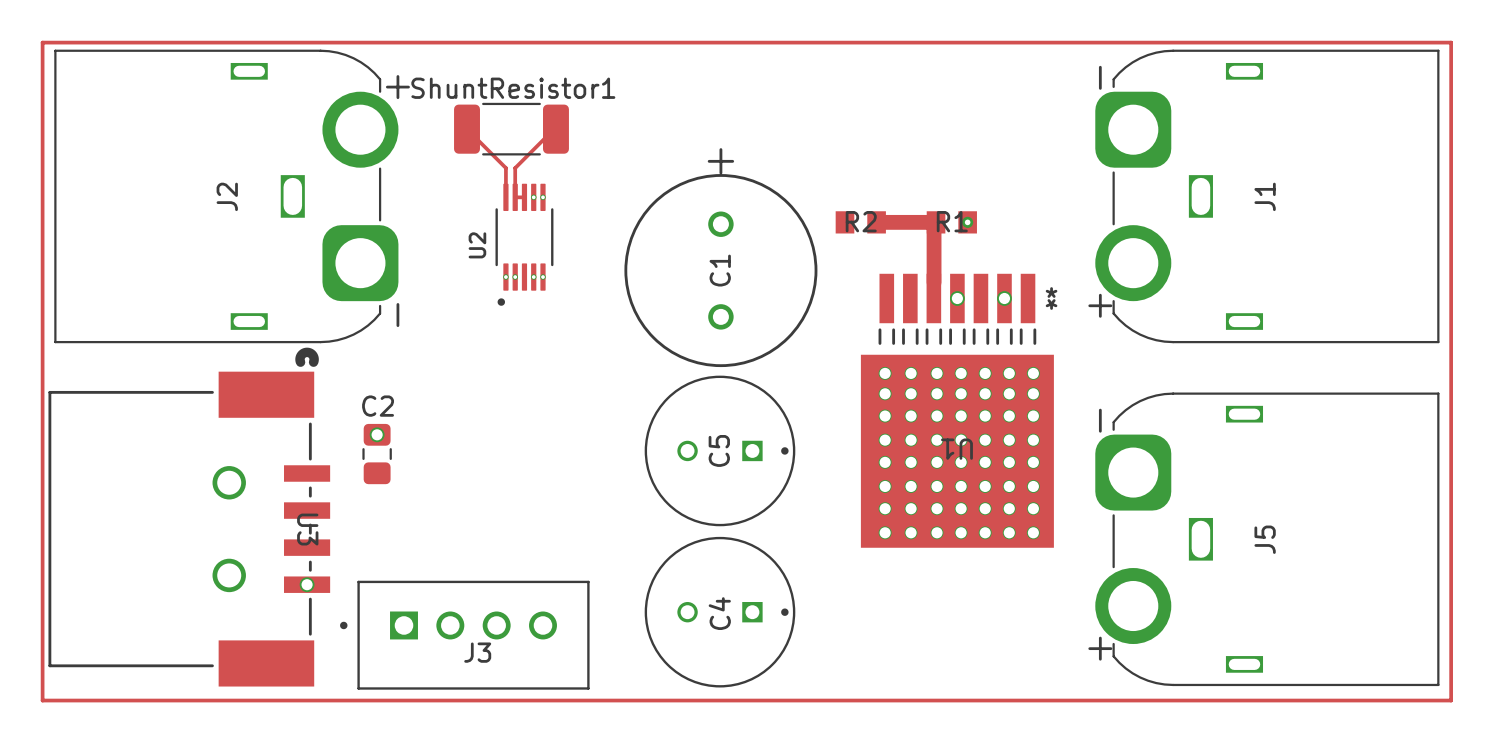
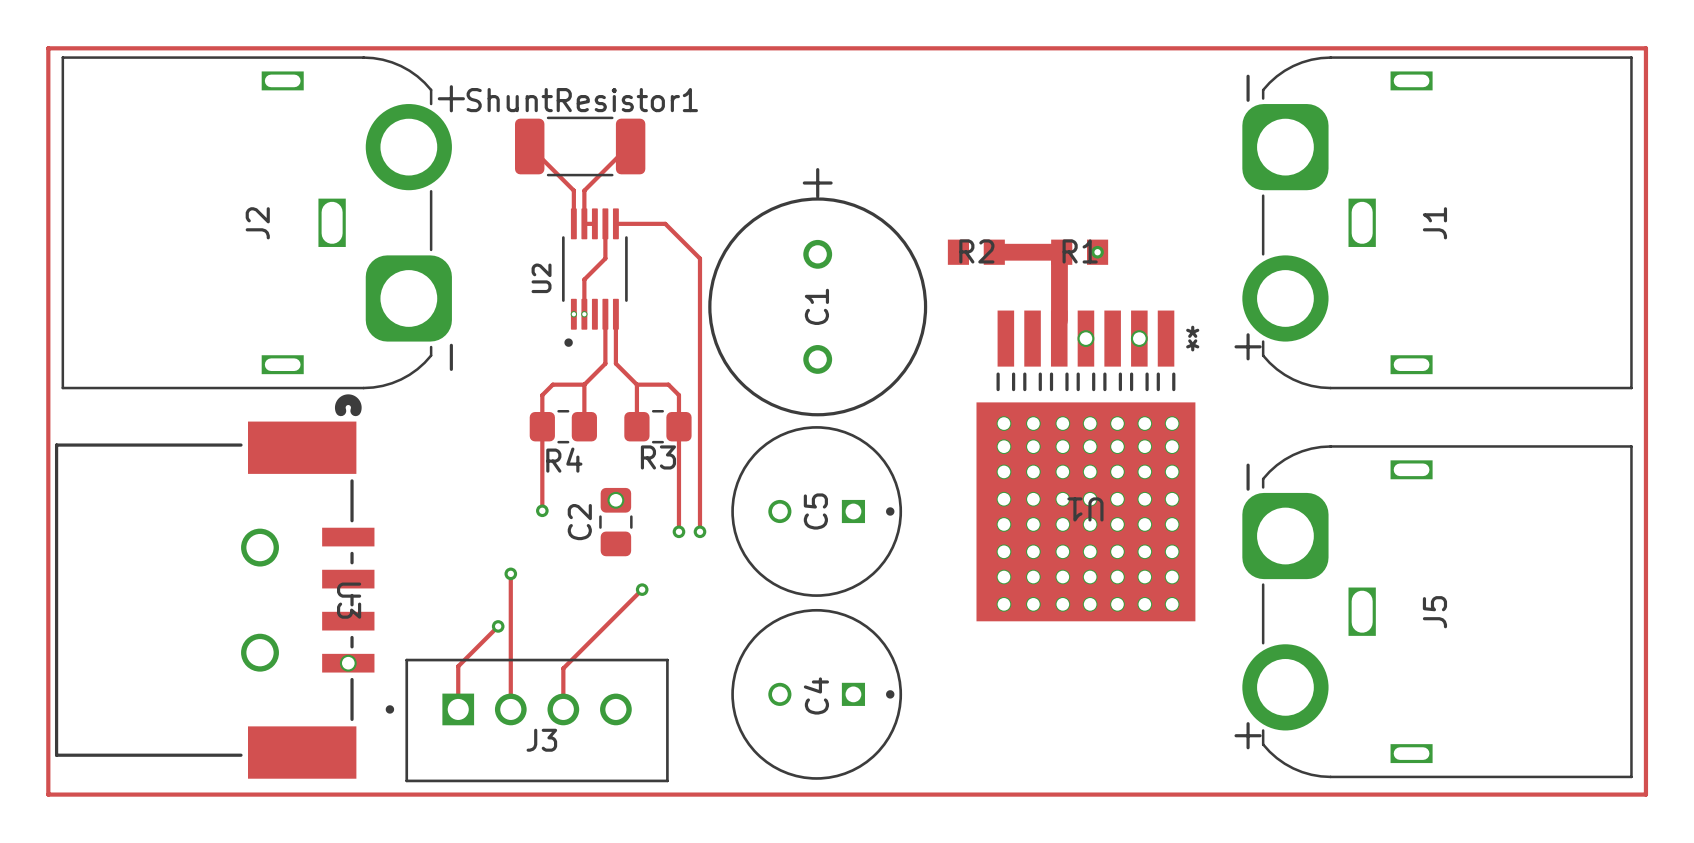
track: none -> (605, 223) (605, 258) (584, 279) (584, 314)
via: (533, 197) -> none
track: none -> (615, 223) (665, 223) (699, 258) (699, 531)
via: (543, 197) -> none
track: none -> (605, 314) (605, 363) (584, 384)
via: (533, 277) -> none
track: none -> (615, 314) (615, 363) (636, 384)
via: (543, 277) -> none
track: none -> (584, 384) (584, 426)
track: none -> (584, 384) (552, 384) (542, 395) (542, 510)
track: none -> (636, 384) (668, 384) (678, 395) (678, 531)
track: none -> (636, 384) (636, 426)
R4: none -> (563, 426)
R3: none -> (657, 426)
C2 name rotation: 0° (378, 406) -> 90° counterclockwise (579, 522)
C2 name position: C2 (378, 406) -> C2 (579, 522)
via: (377, 434) -> none
via: none -> (615, 500)
via: none -> (542, 510)
C2 position: (377, 454) -> (615, 522)
via: none -> (678, 531)
via: none -> (699, 531)
track: none -> (510, 573) (510, 709)
via: none -> (510, 573)
track: none -> (642, 589) (563, 668) (563, 709)
via: none -> (642, 589)
track: none -> (498, 626) (458, 666) (458, 709)
via: none -> (498, 626)

